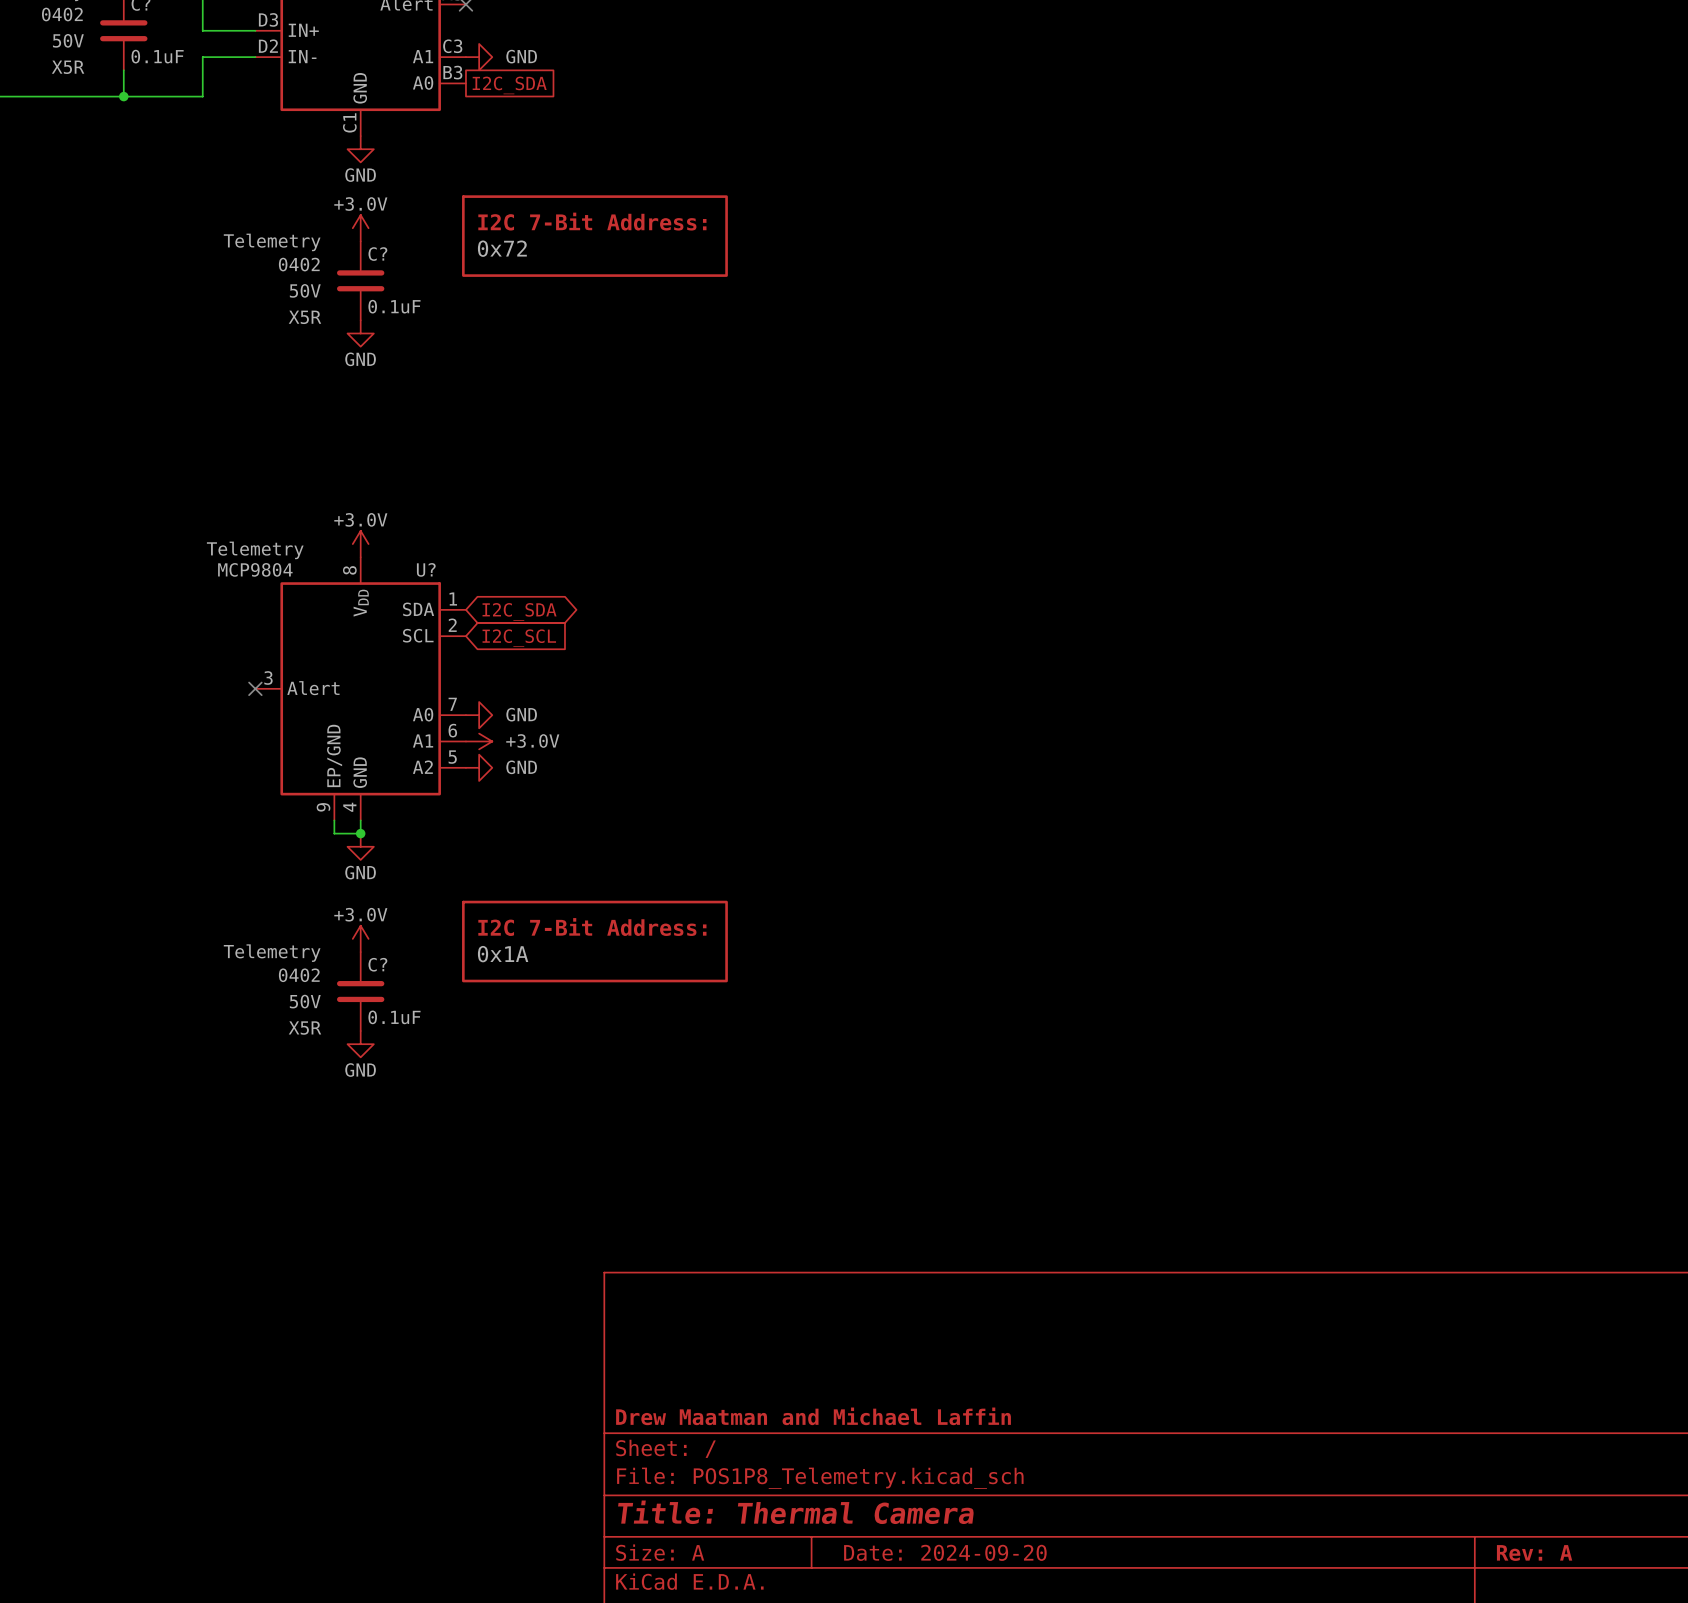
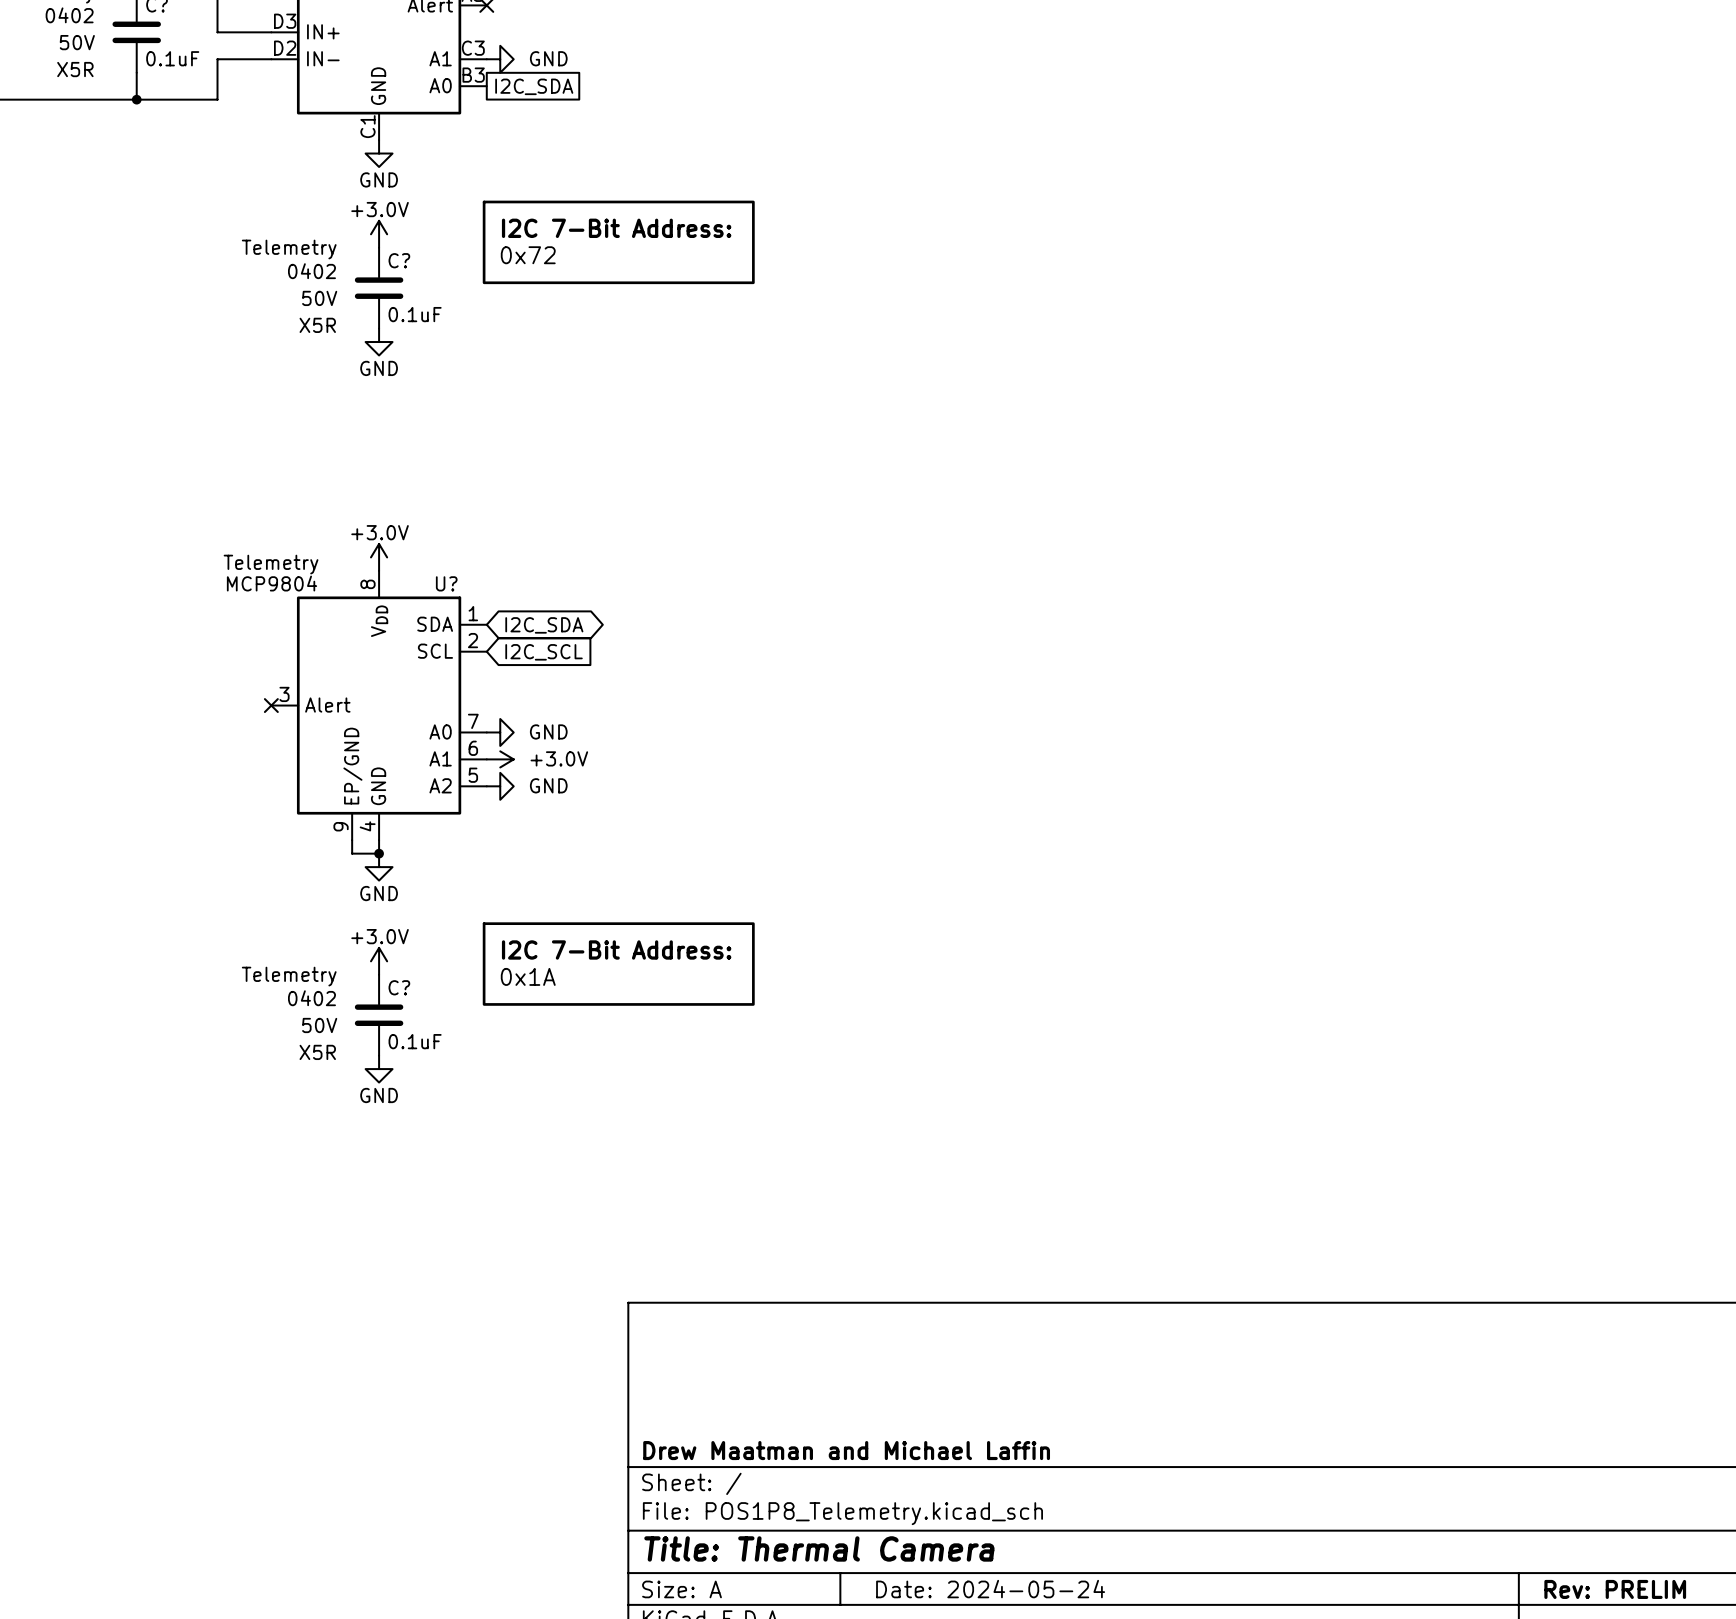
title block: Date: 2024-09-20 (945, 1552) -> Date: 2024-05-24 (990, 1589)
title block: Rev: A (1534, 1553) -> Rev: PRELIM (1615, 1589)

